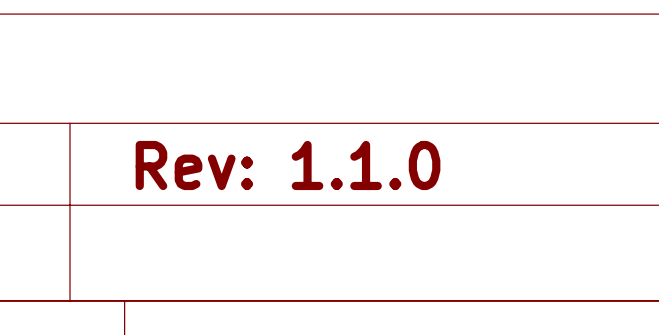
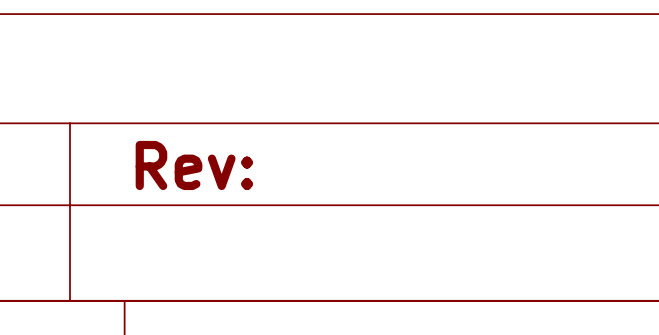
title block: Rev: 1.1.0 (288, 165) -> Rev: (194, 165)

